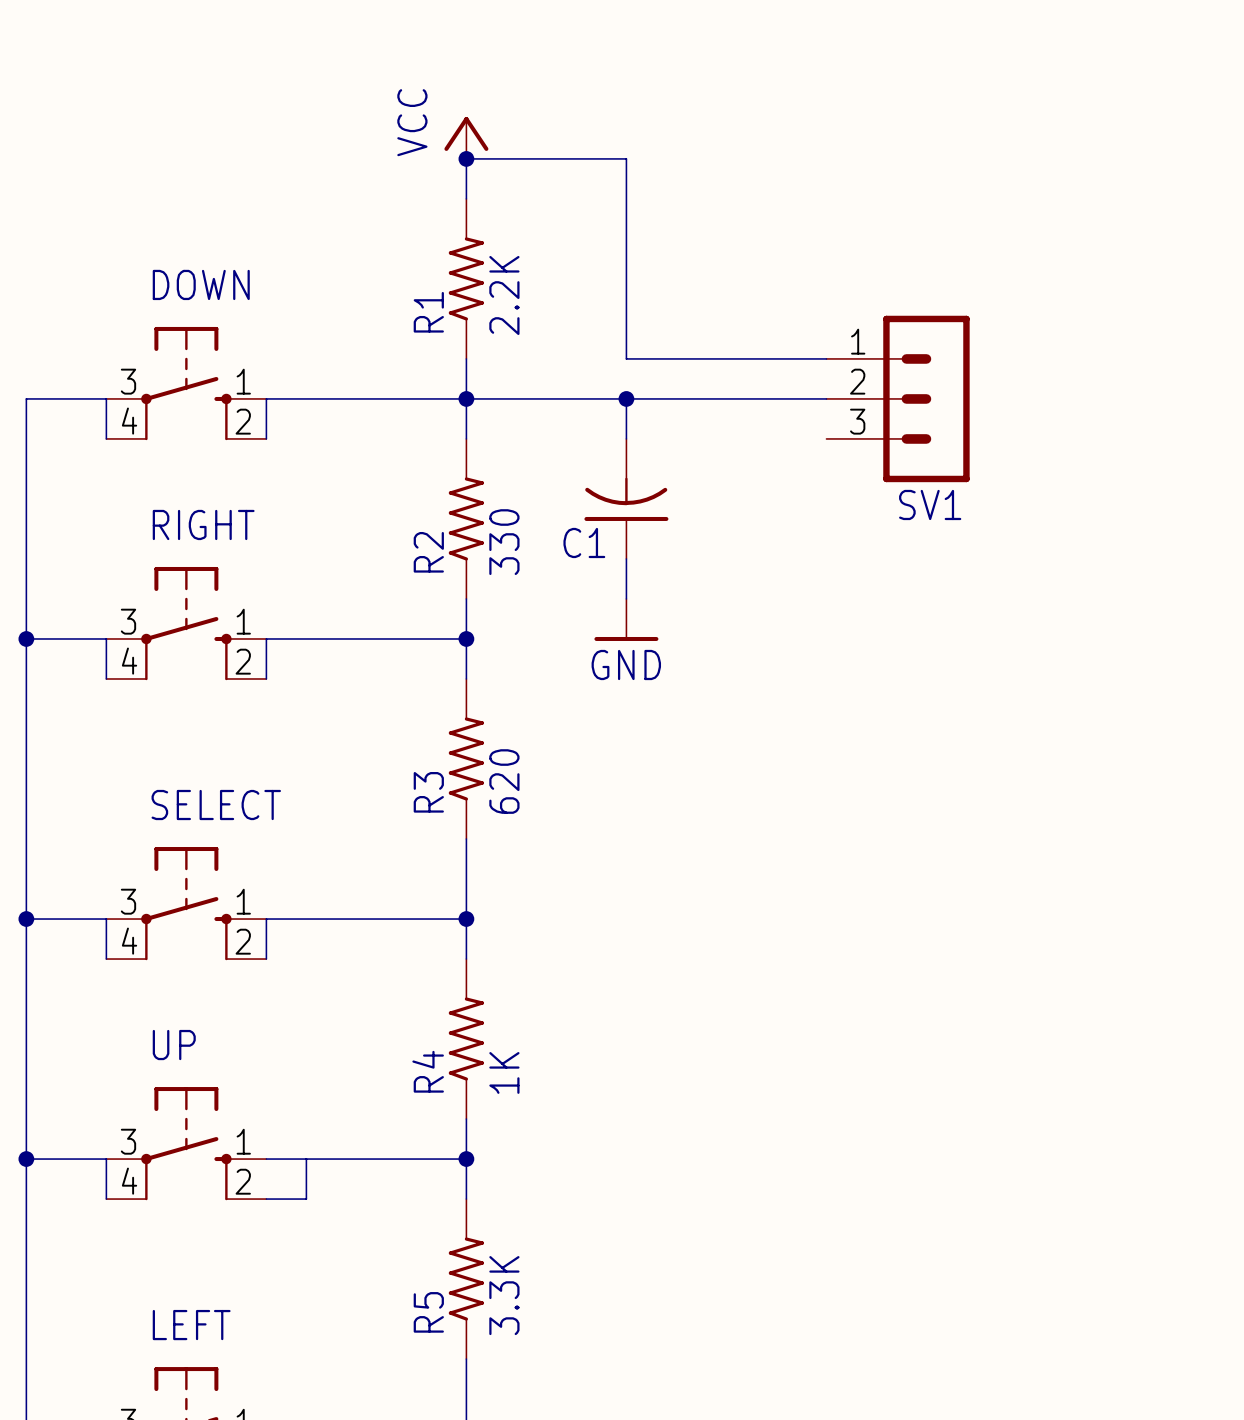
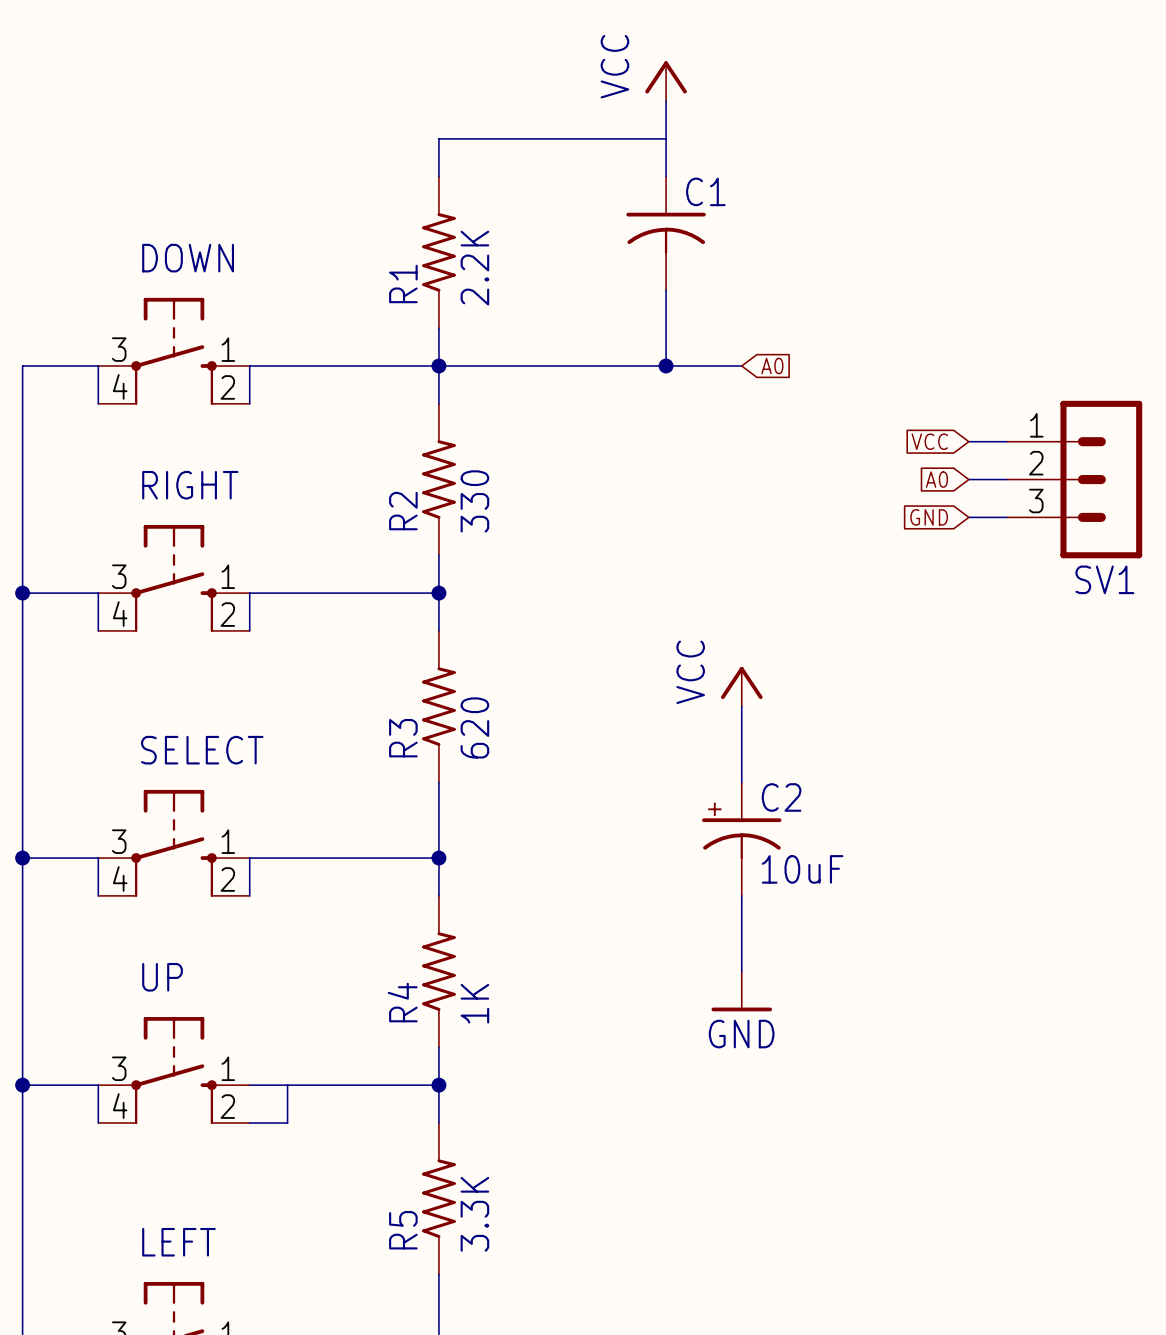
wire: none -> (666, 101) (666, 176)
power symbol position: VCC (466, 137) -> VCC (666, 81)
junction: (466, 158) -> none
wire: (626, 158) (626, 358) (826, 358) -> (590, 138) (666, 138)
wire: none -> (666, 290) (666, 366)
wire: (626, 398) (626, 438) -> none
junction position: (626, 398) -> (666, 366)
wire: (786, 398) (826, 398) -> (968, 441) (1006, 441)
global label: none -> A0 (772, 366)
SV1 position: (898, 398) -> (1074, 479)
global label: none -> VCC (929, 441)
C1 position: (626, 498) -> (666, 233)
C1 rotation: 0° (626, 499) -> 180° (666, 233)
global label: none -> A0 (936, 479)
wire: none -> (968, 479) (1006, 479)
wire: (626, 558) (626, 598) -> none
global label: none -> GND (929, 517)
wire: none -> (968, 517) (1006, 517)
power symbol: GND (626, 619) -> none
power symbol: none -> VCC (741, 686)
wire: none -> (741, 706) (741, 782)
C2: none -> 10uF (741, 839)
wire: none -> (741, 895) (741, 971)
power symbol: none -> GND (741, 991)

